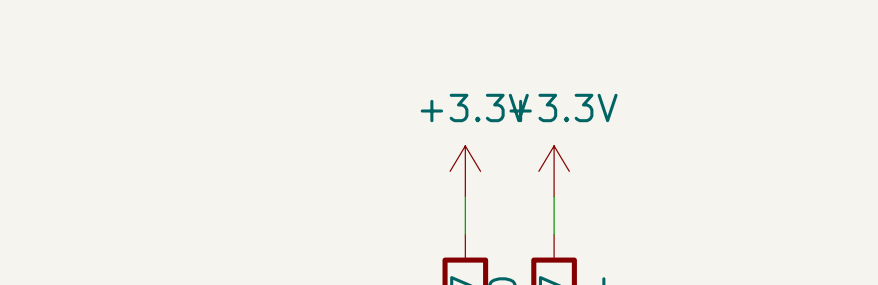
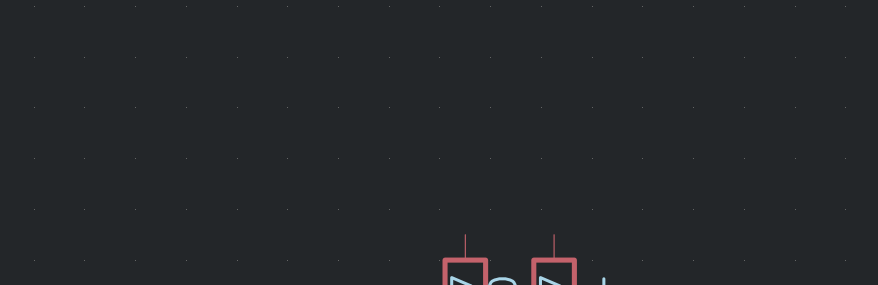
power symbol: +3.3V (465, 171) -> none
power symbol: +3.3V (554, 171) -> none
wire: (465, 196) (465, 234) -> none
wire: (554, 196) (554, 234) -> none

